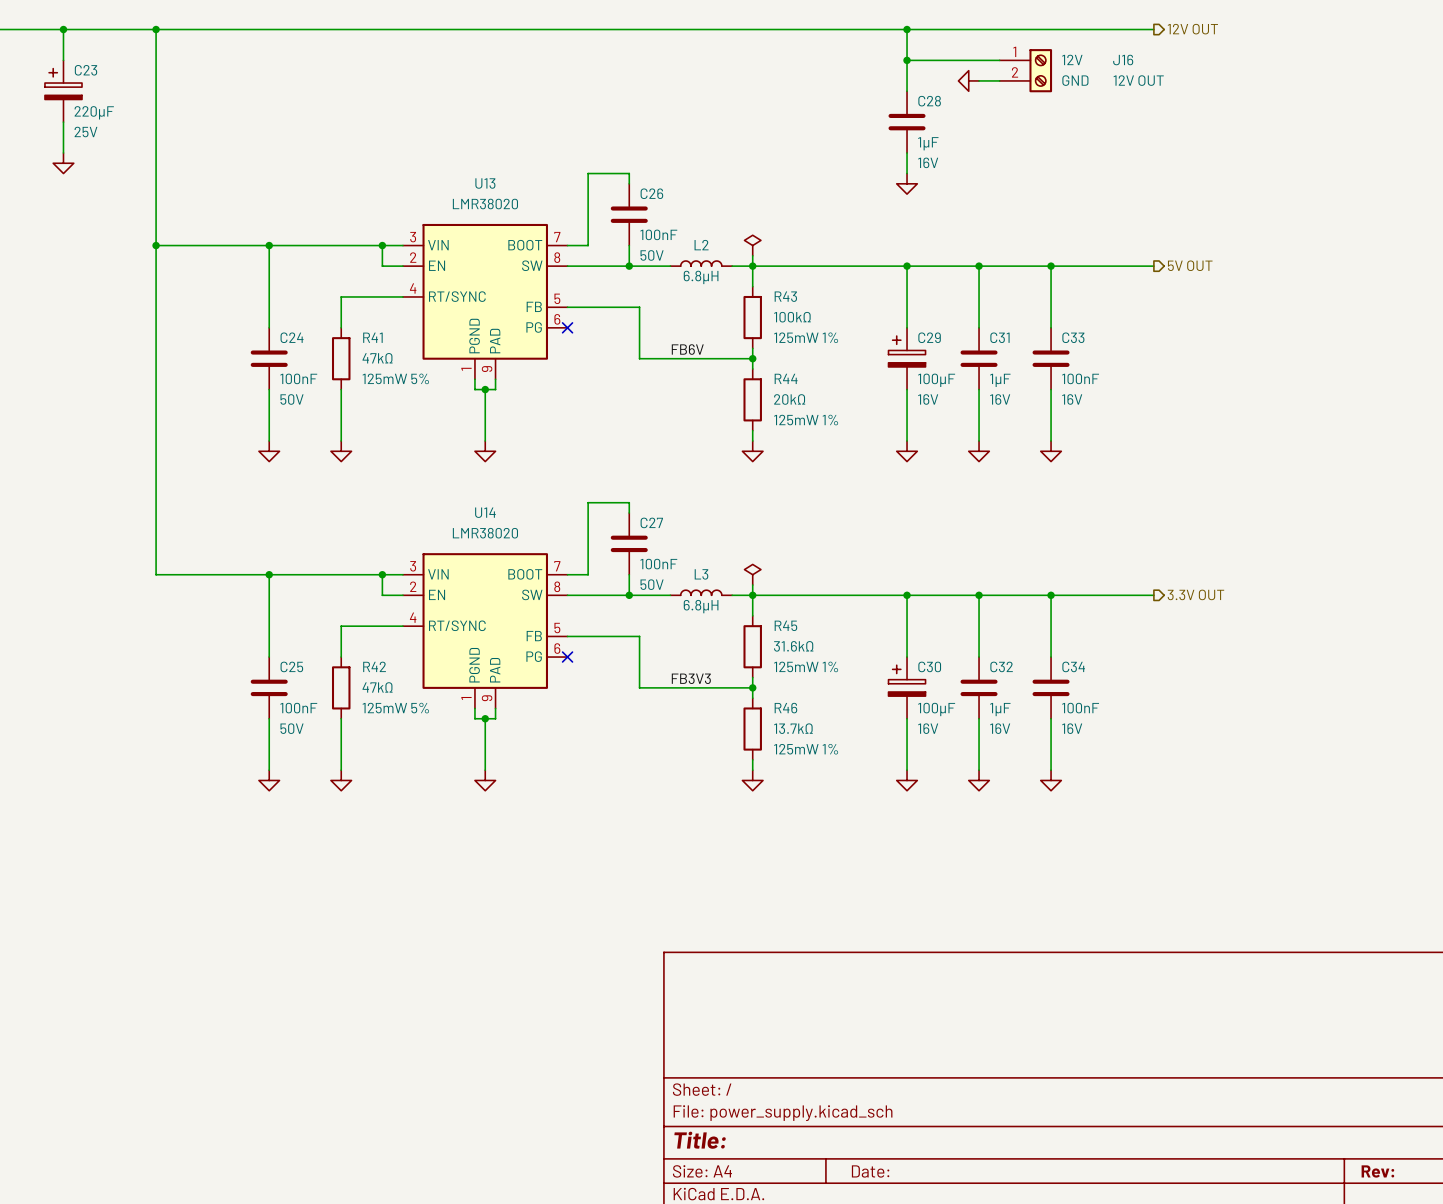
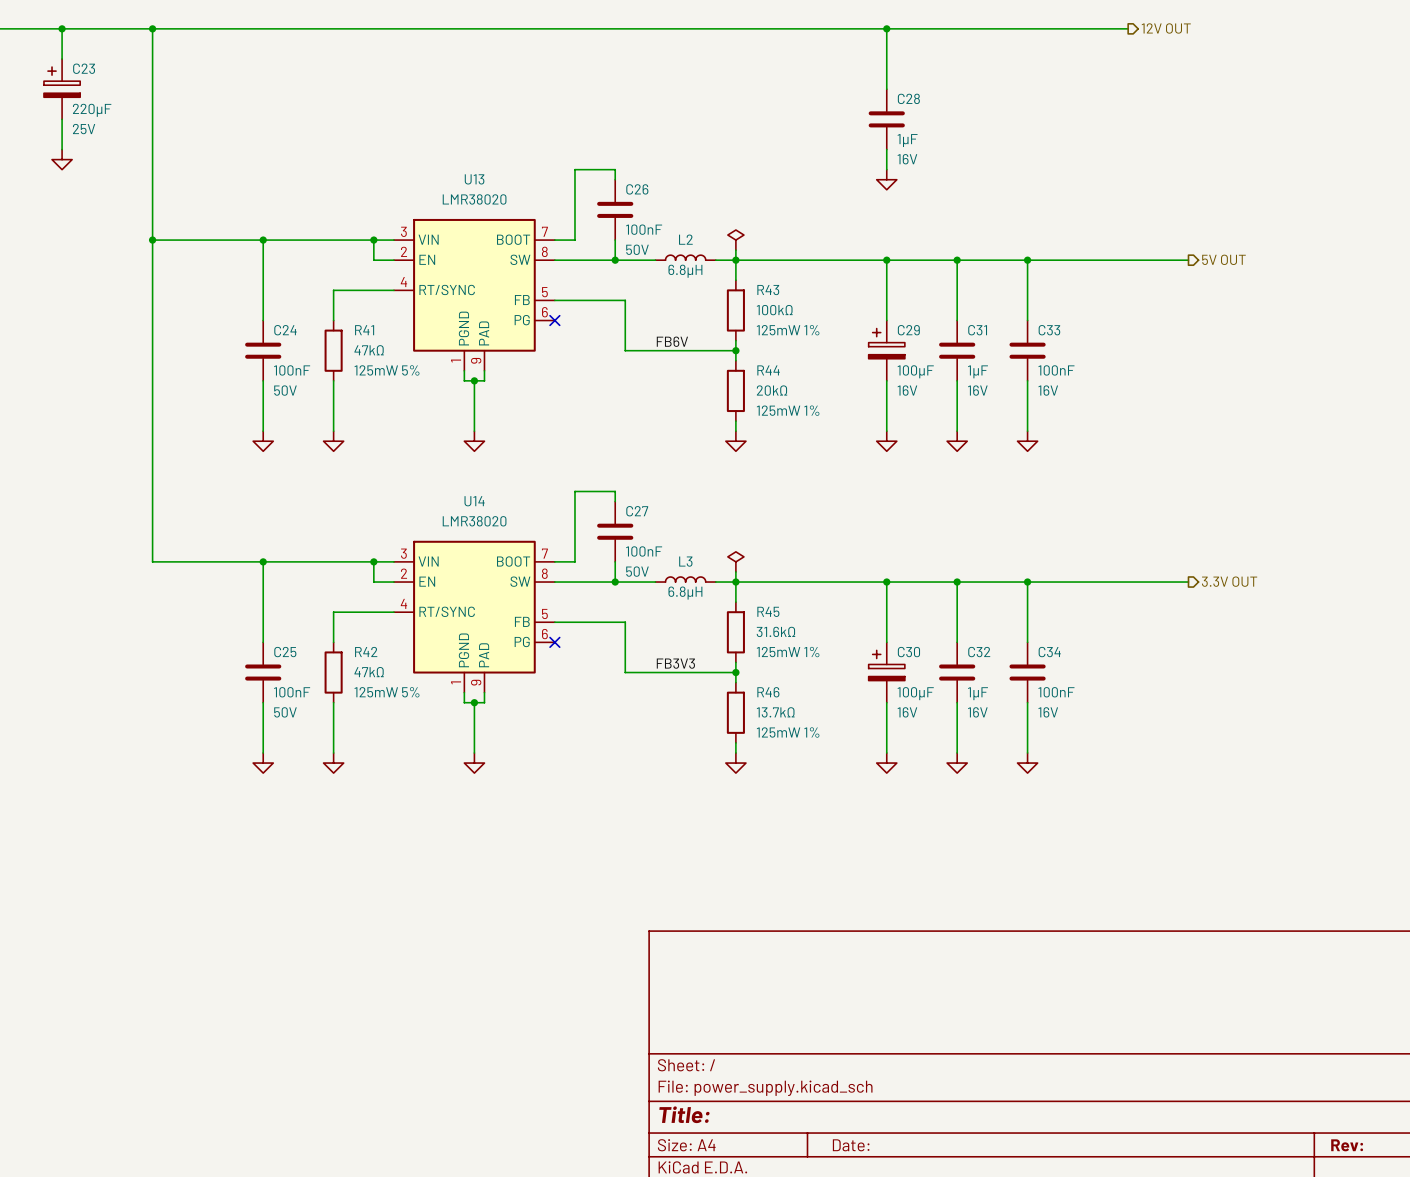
wire: (907, 60) (999, 60) -> none
junction: (907, 60) -> none
J16: (1025, 70) -> none
power symbol: (968, 80) -> none
wire: (979, 80) (999, 80) -> none
hierarchical label position: 5V OUT (1190, 265) -> 5V OUT (1223, 259)
wire: none -> (1128, 260) (1188, 260)
hierarchical label position: 3.3V OUT (1195, 594) -> 3.3V OUT (1229, 581)
wire: none -> (1128, 582) (1188, 582)

